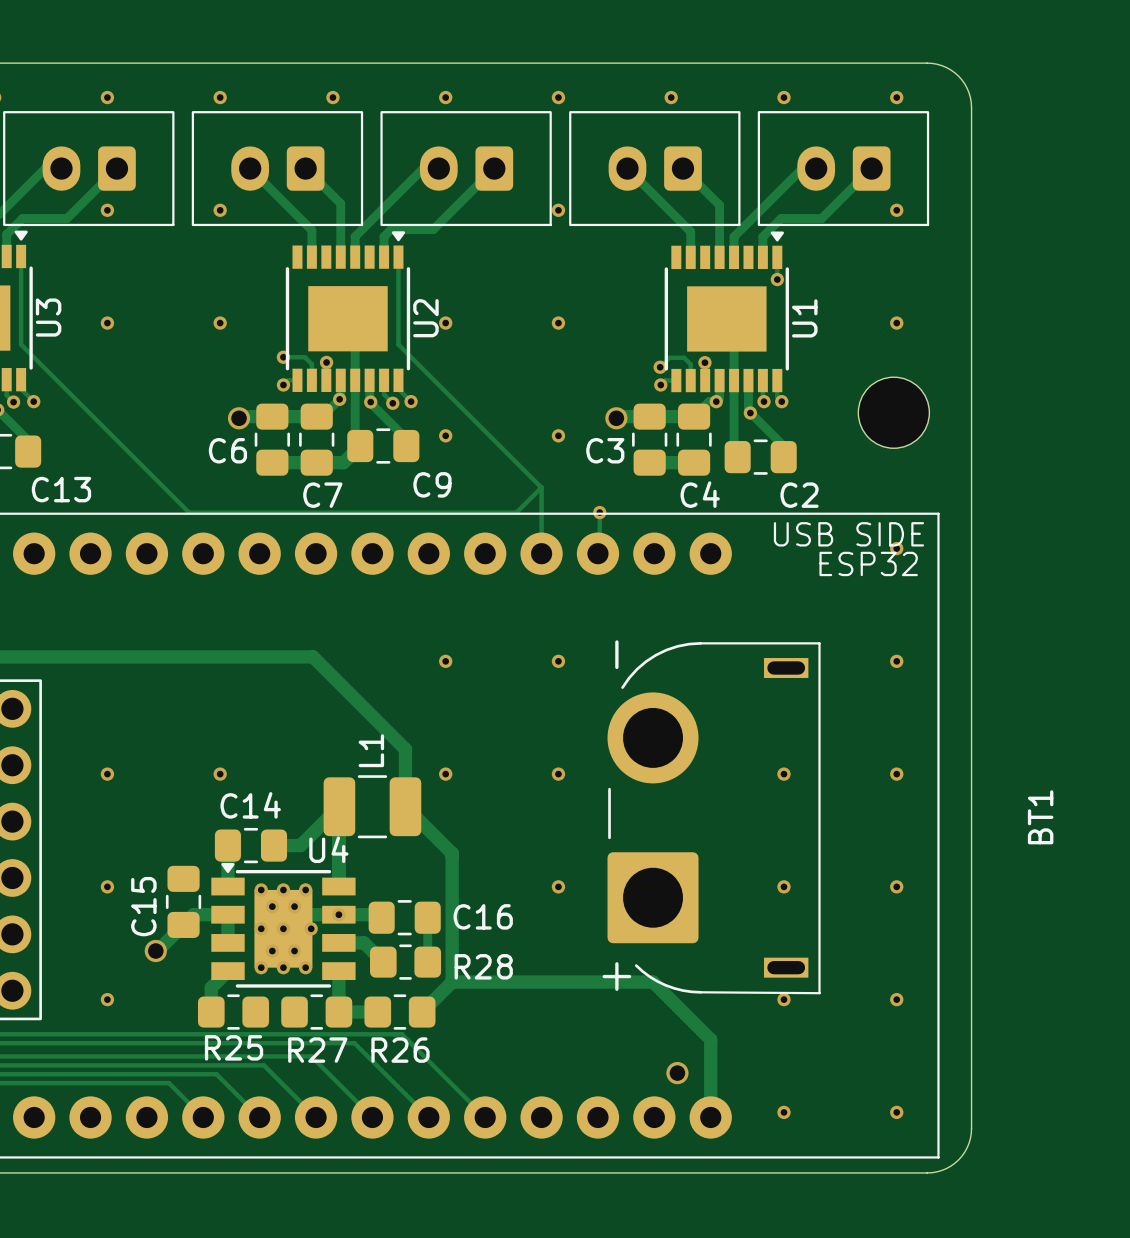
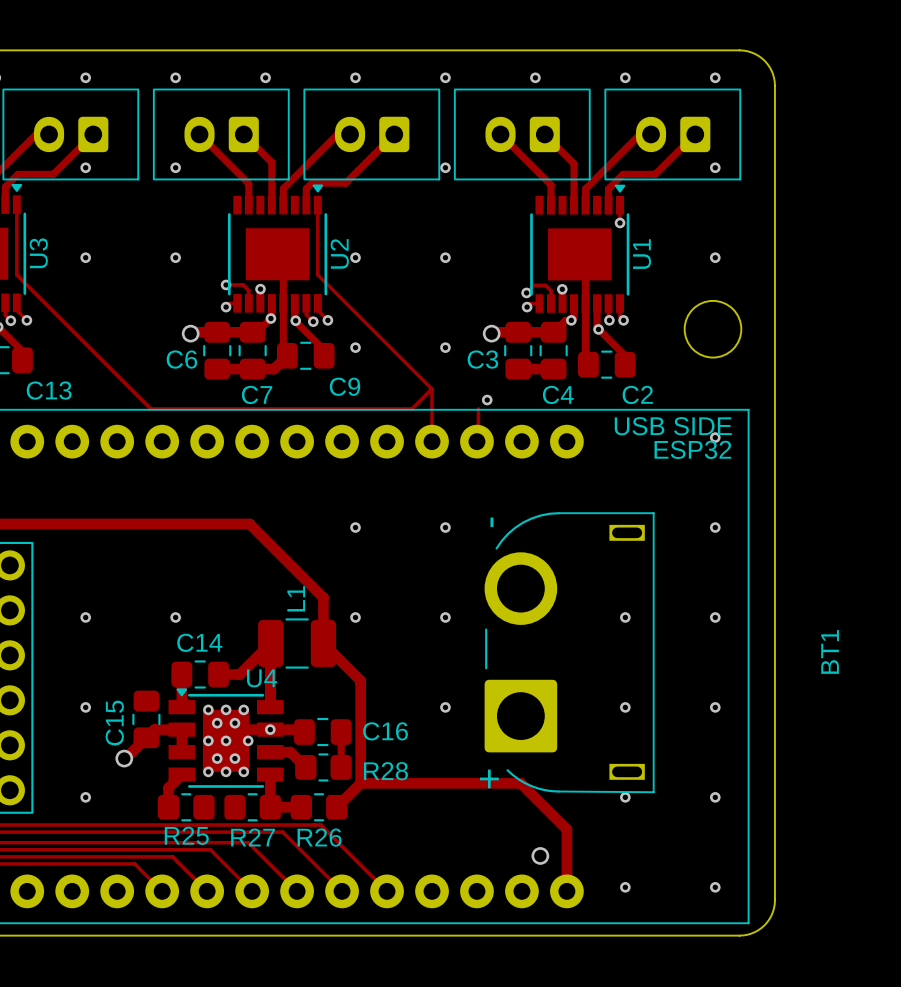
via position: (599, 512) -> (487, 400)

